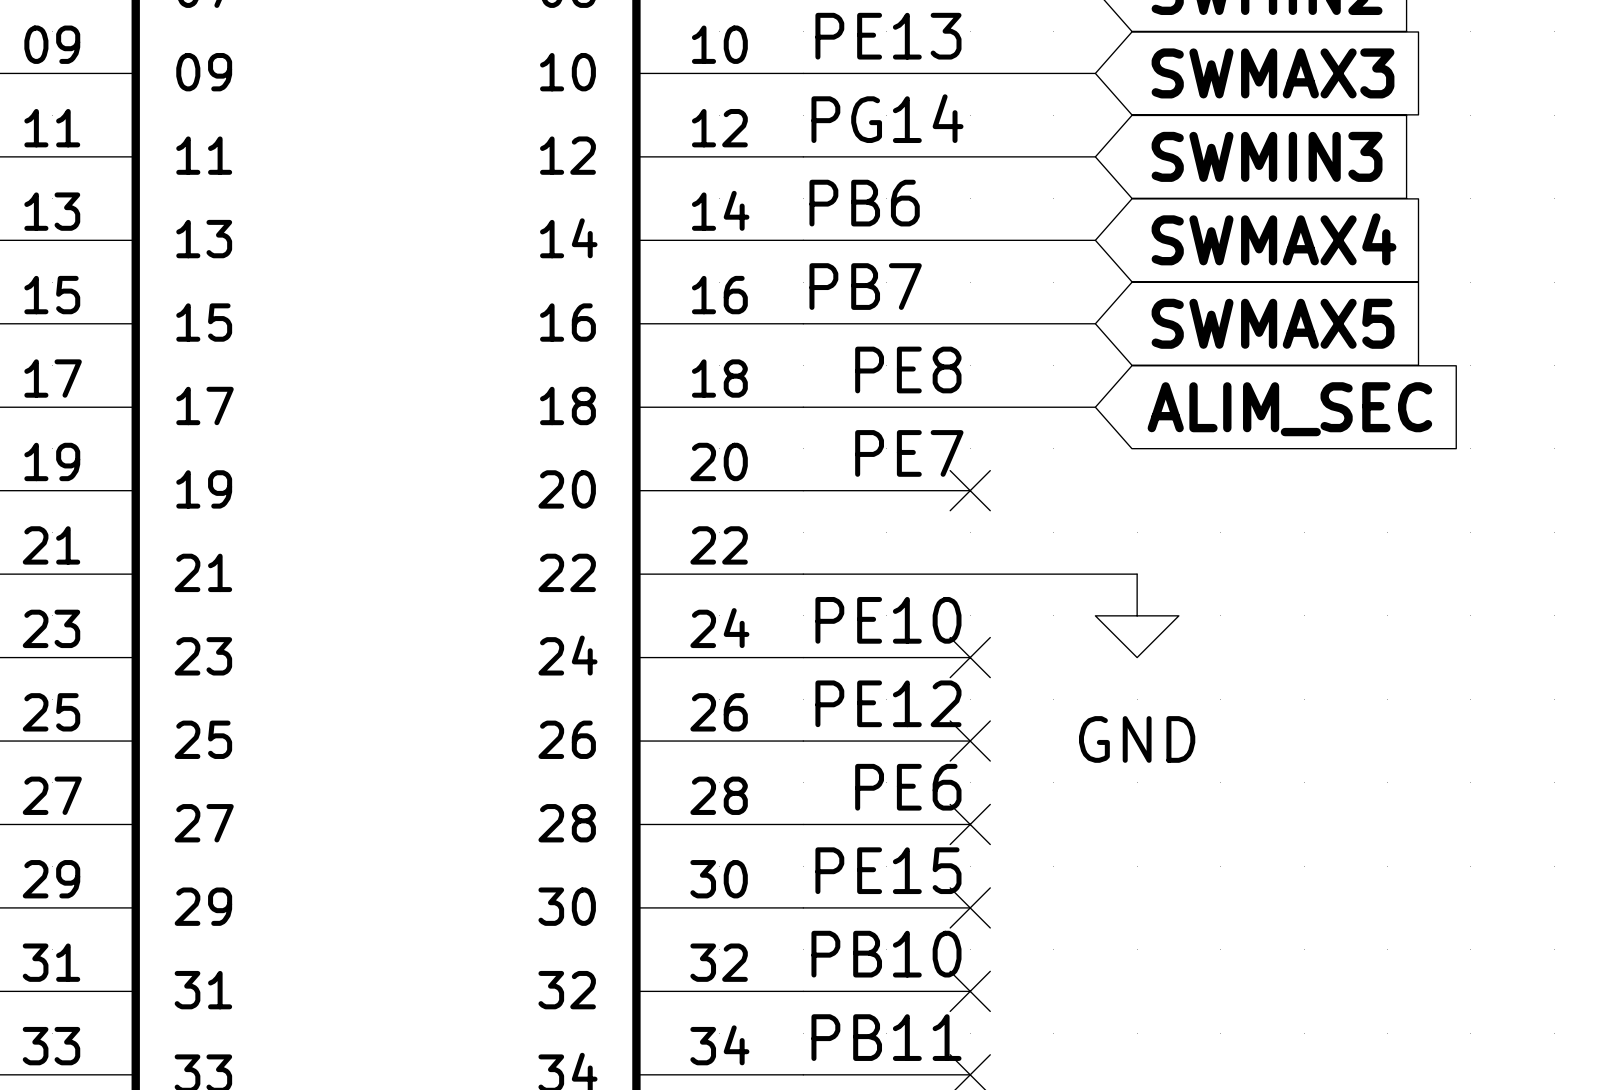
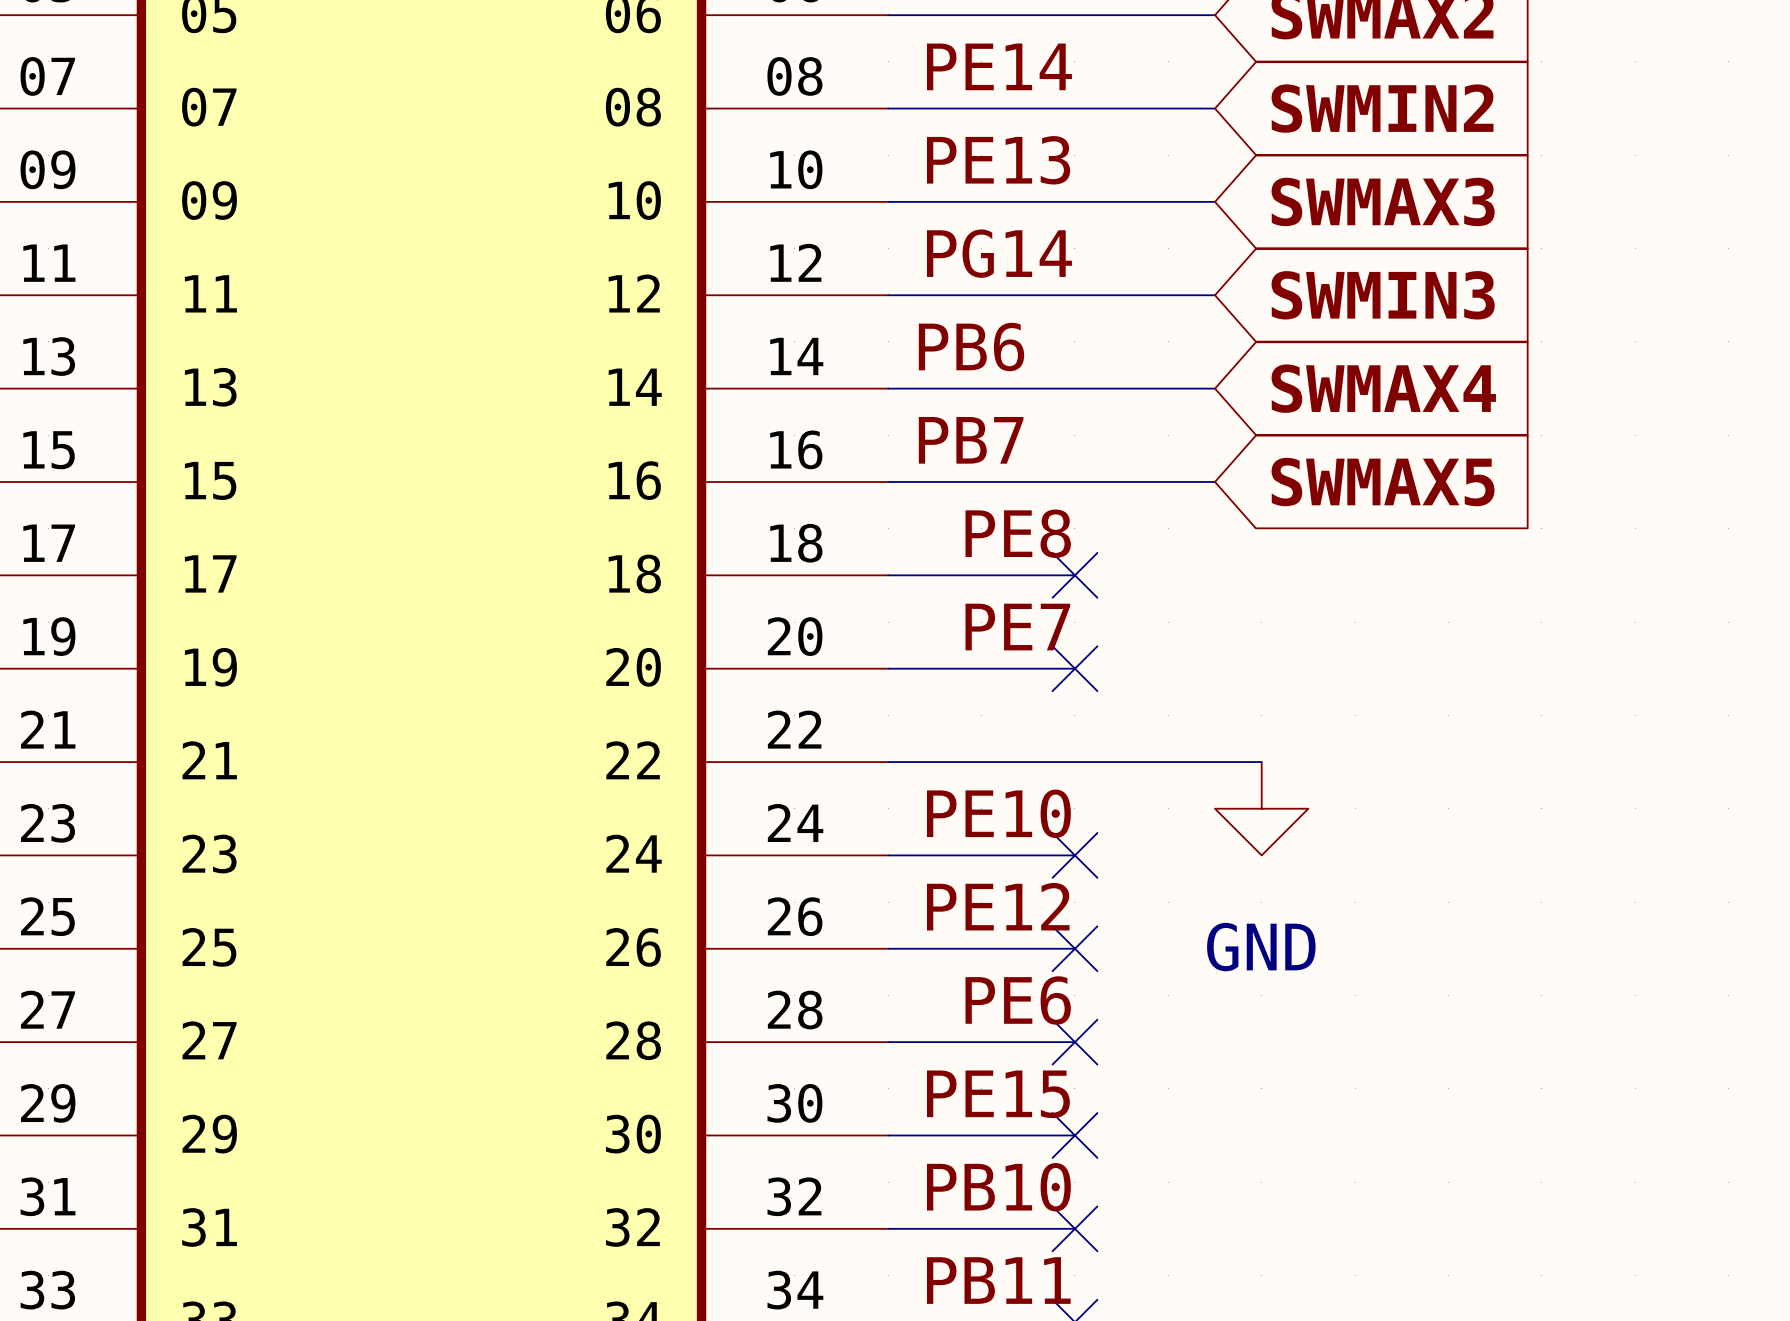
wire: (970, 407) (1095, 407) -> none
no-connect mark: none -> (1074, 575)
global label: ALIM_SEC (1289, 409) -> none

